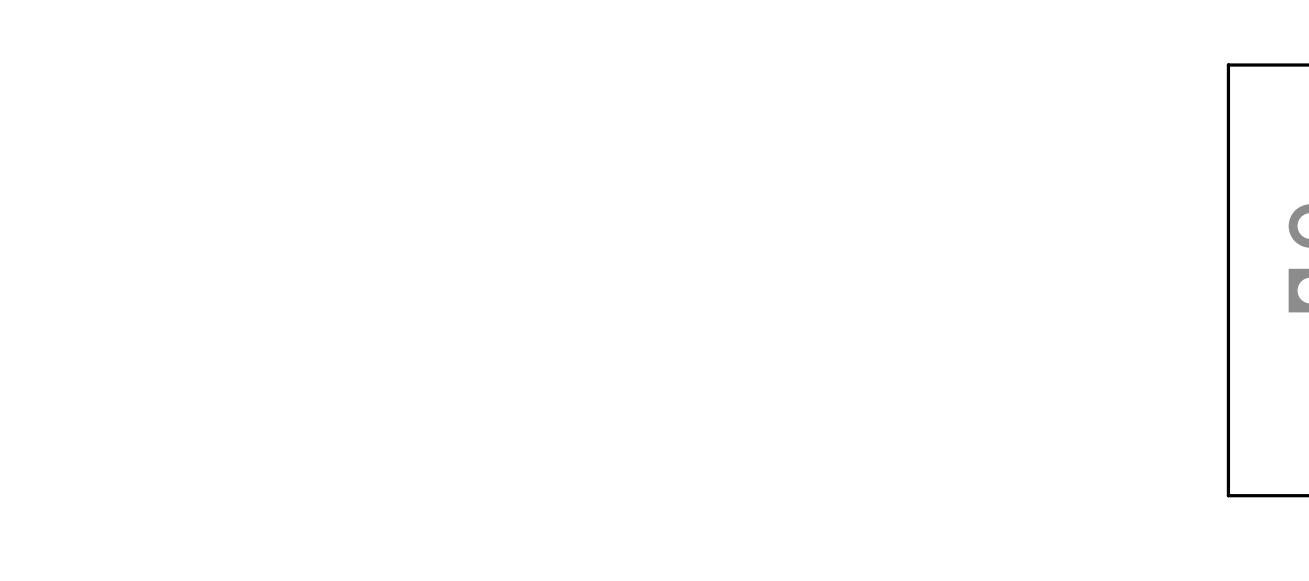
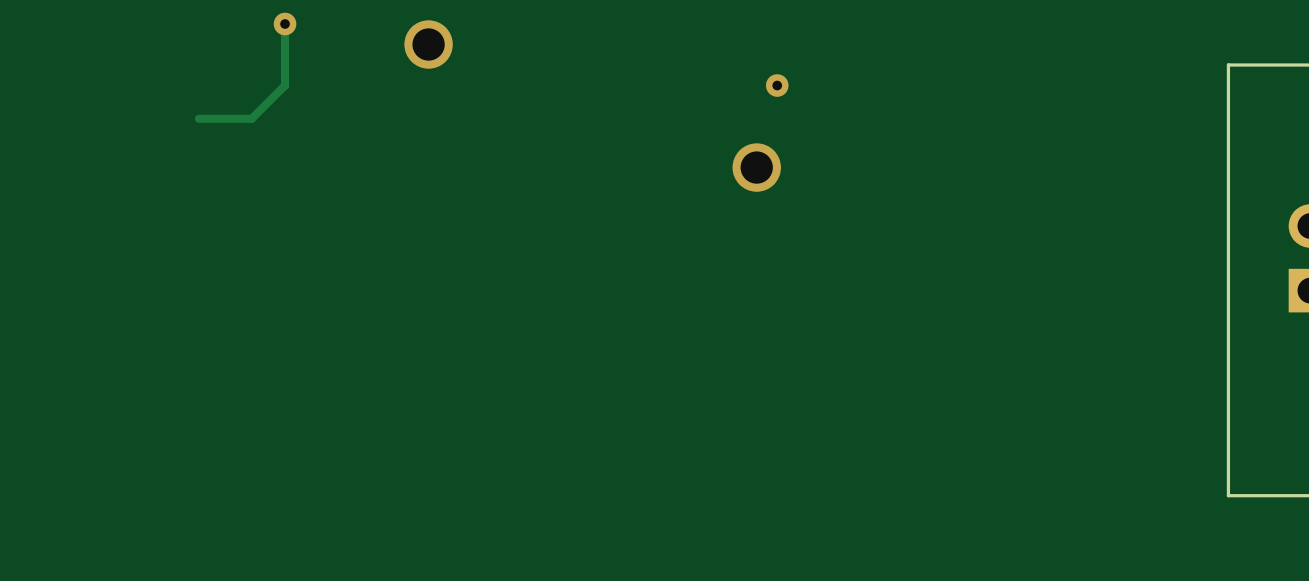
track: none -> (285, 23) (285, 85) (251, 118) (198, 118)
via: none -> (285, 23)
via: none -> (428, 44)
via: none -> (777, 85)
via: none -> (756, 167)

